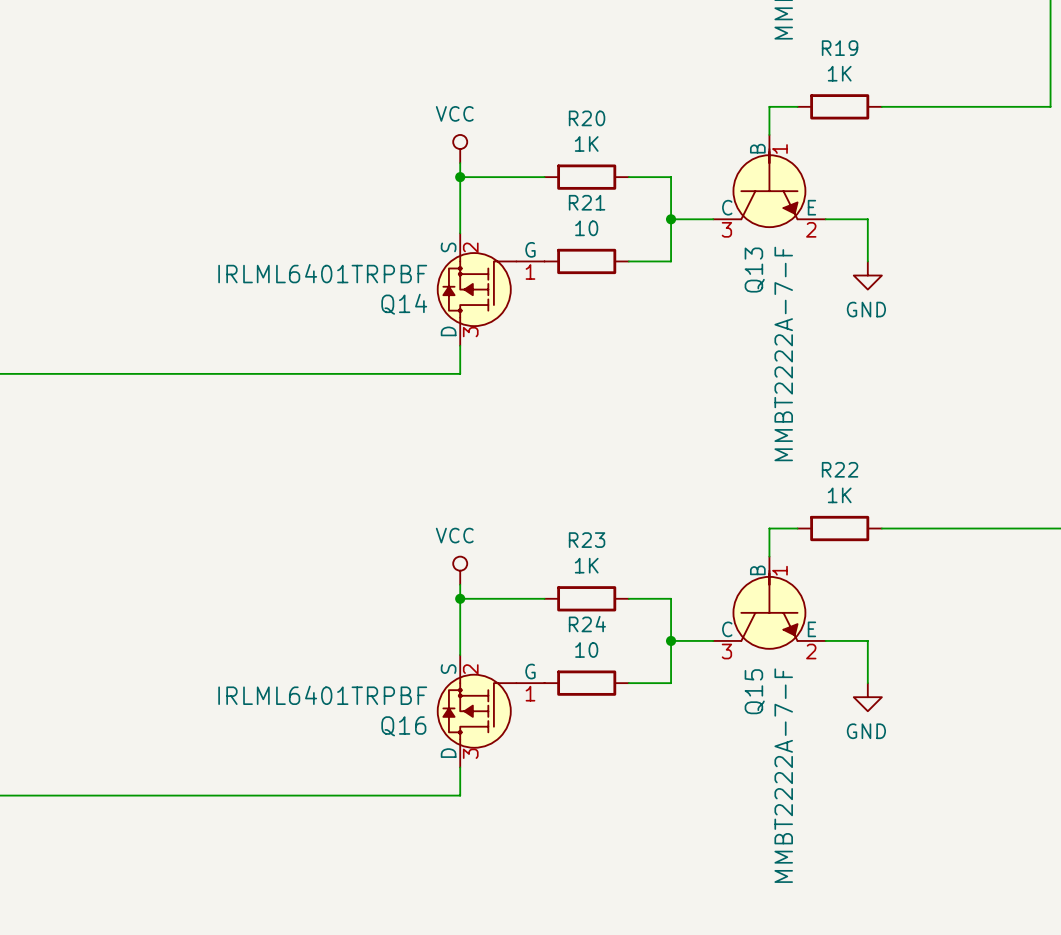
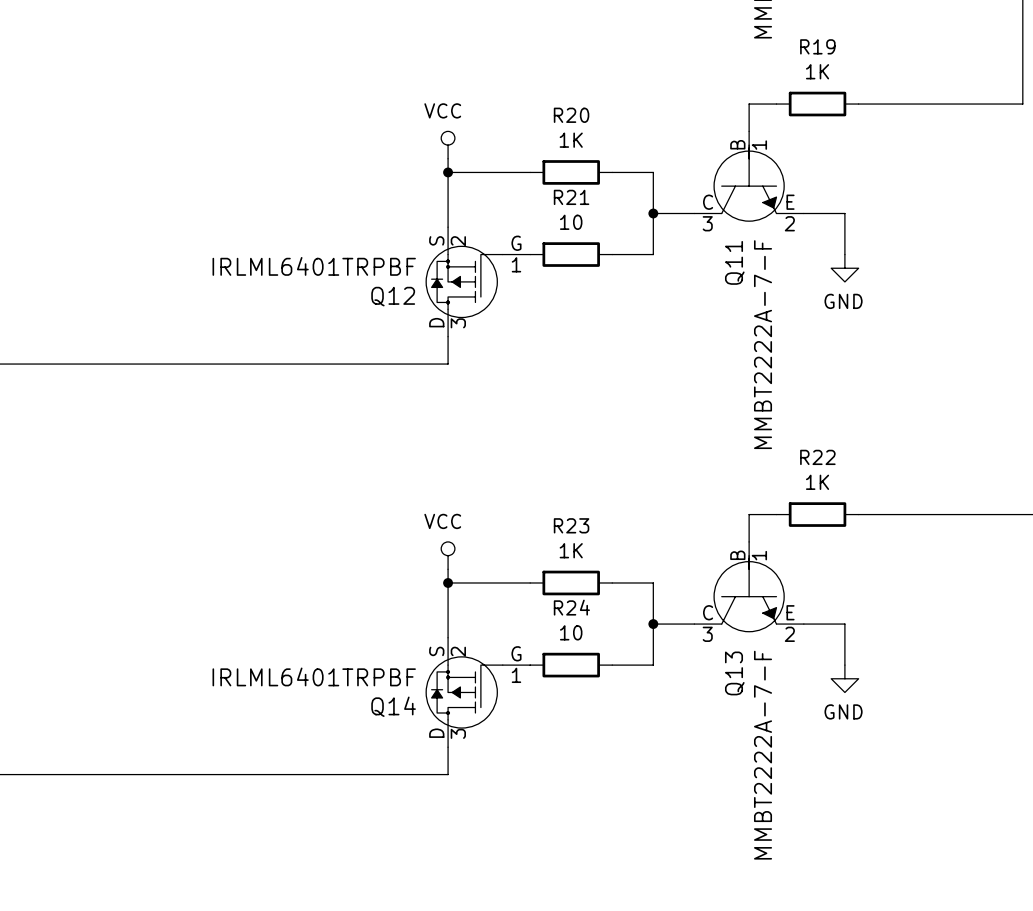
Q13 name: Q13 (754, 270) -> Q11 (734, 262)
Q14 name: Q14 (404, 304) -> Q12 (393, 296)
Q15 name: Q15 (754, 691) -> Q13 (734, 673)
Q16 name: Q16 (403, 726) -> Q14 (393, 706)

